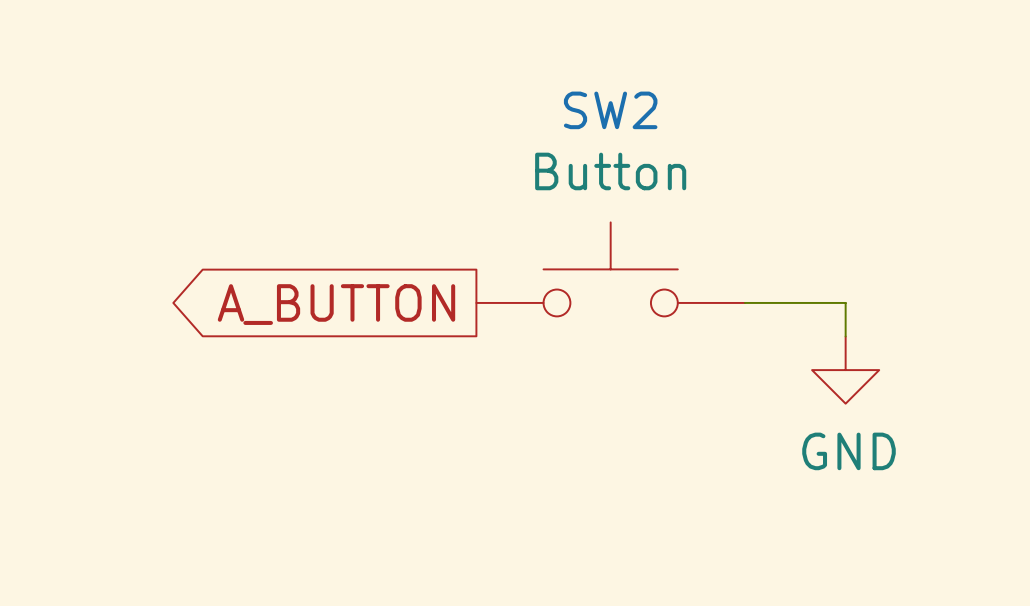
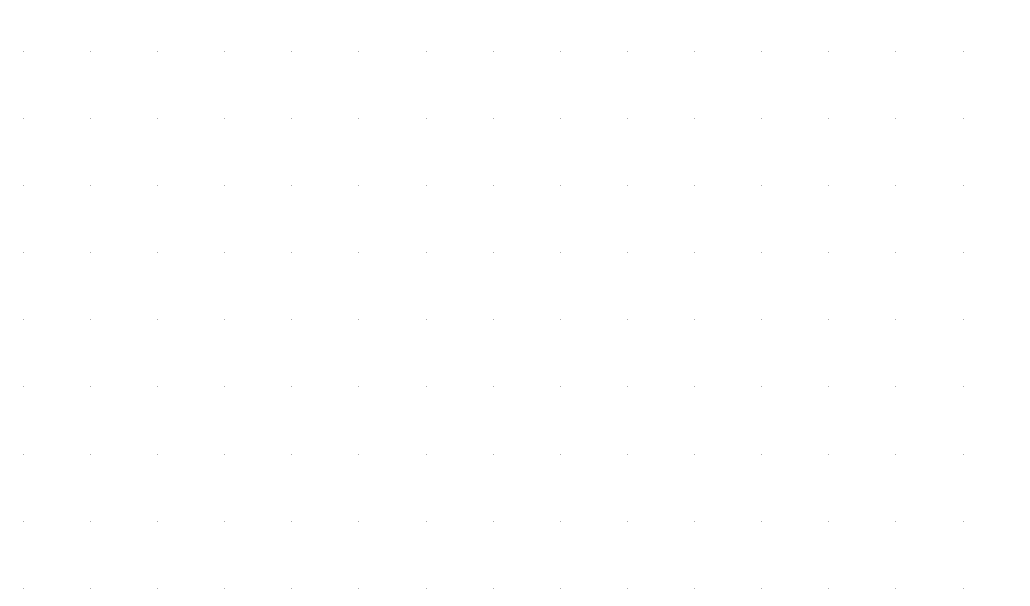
SW2: Button (610, 269) -> none
wire: (744, 302) (845, 302) (845, 336) -> none
global label: A_BUTTON (336, 304) -> none
power symbol: GND (845, 370) -> none

